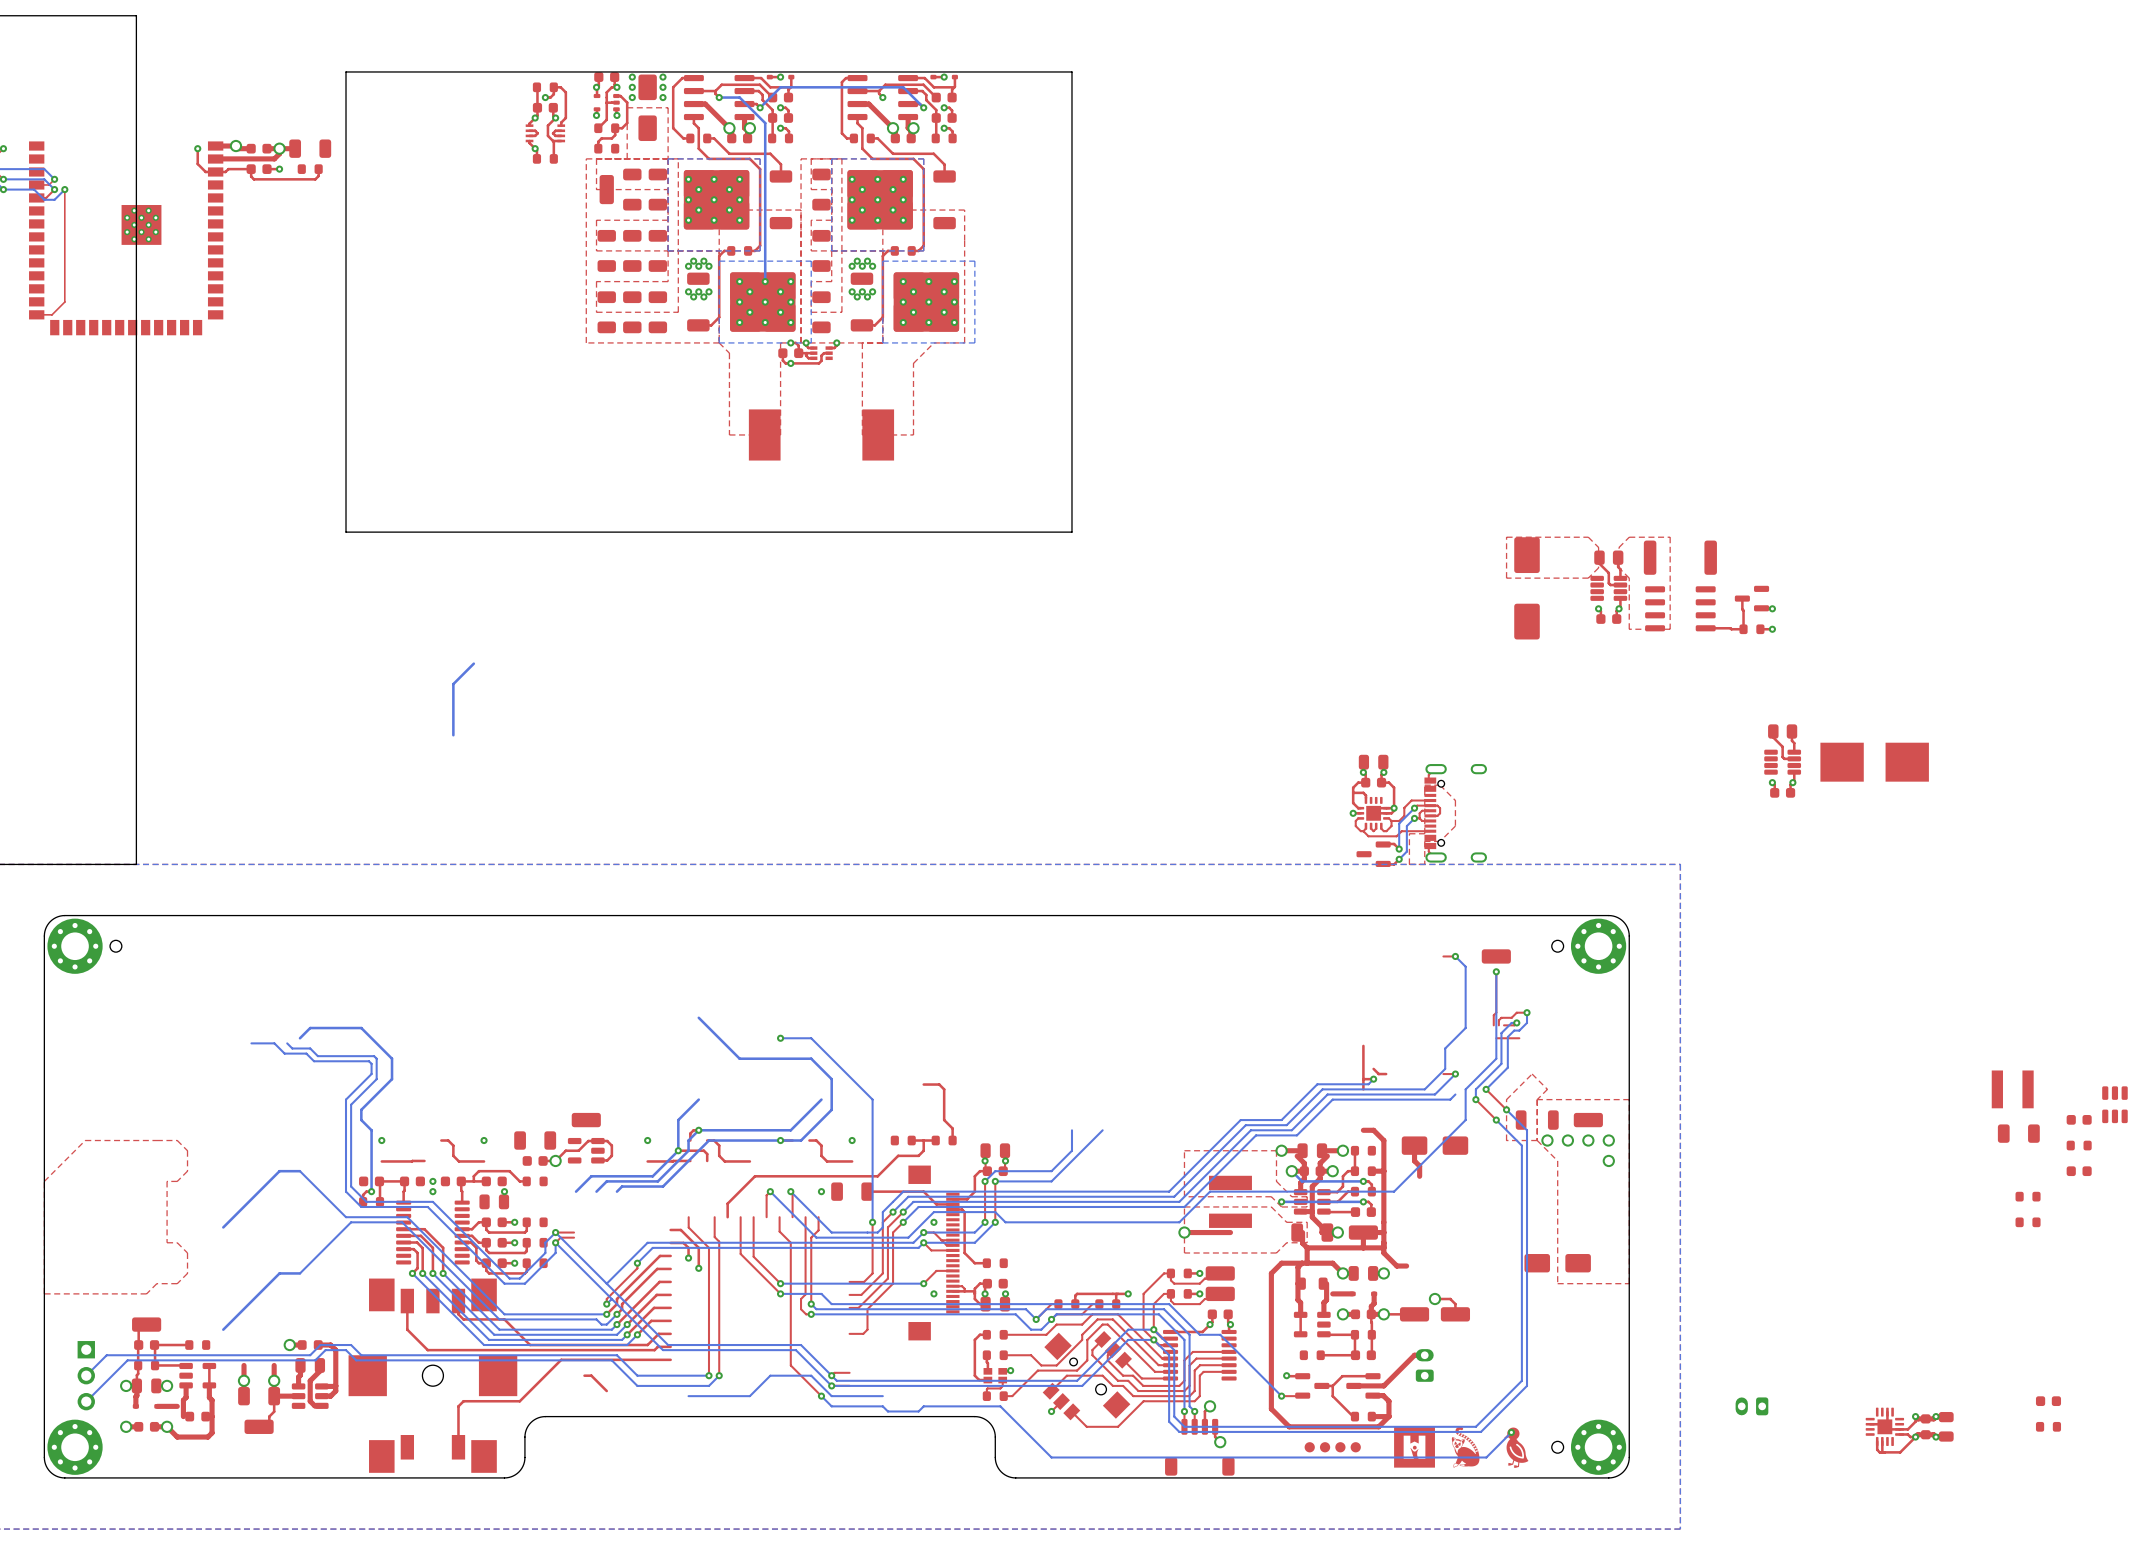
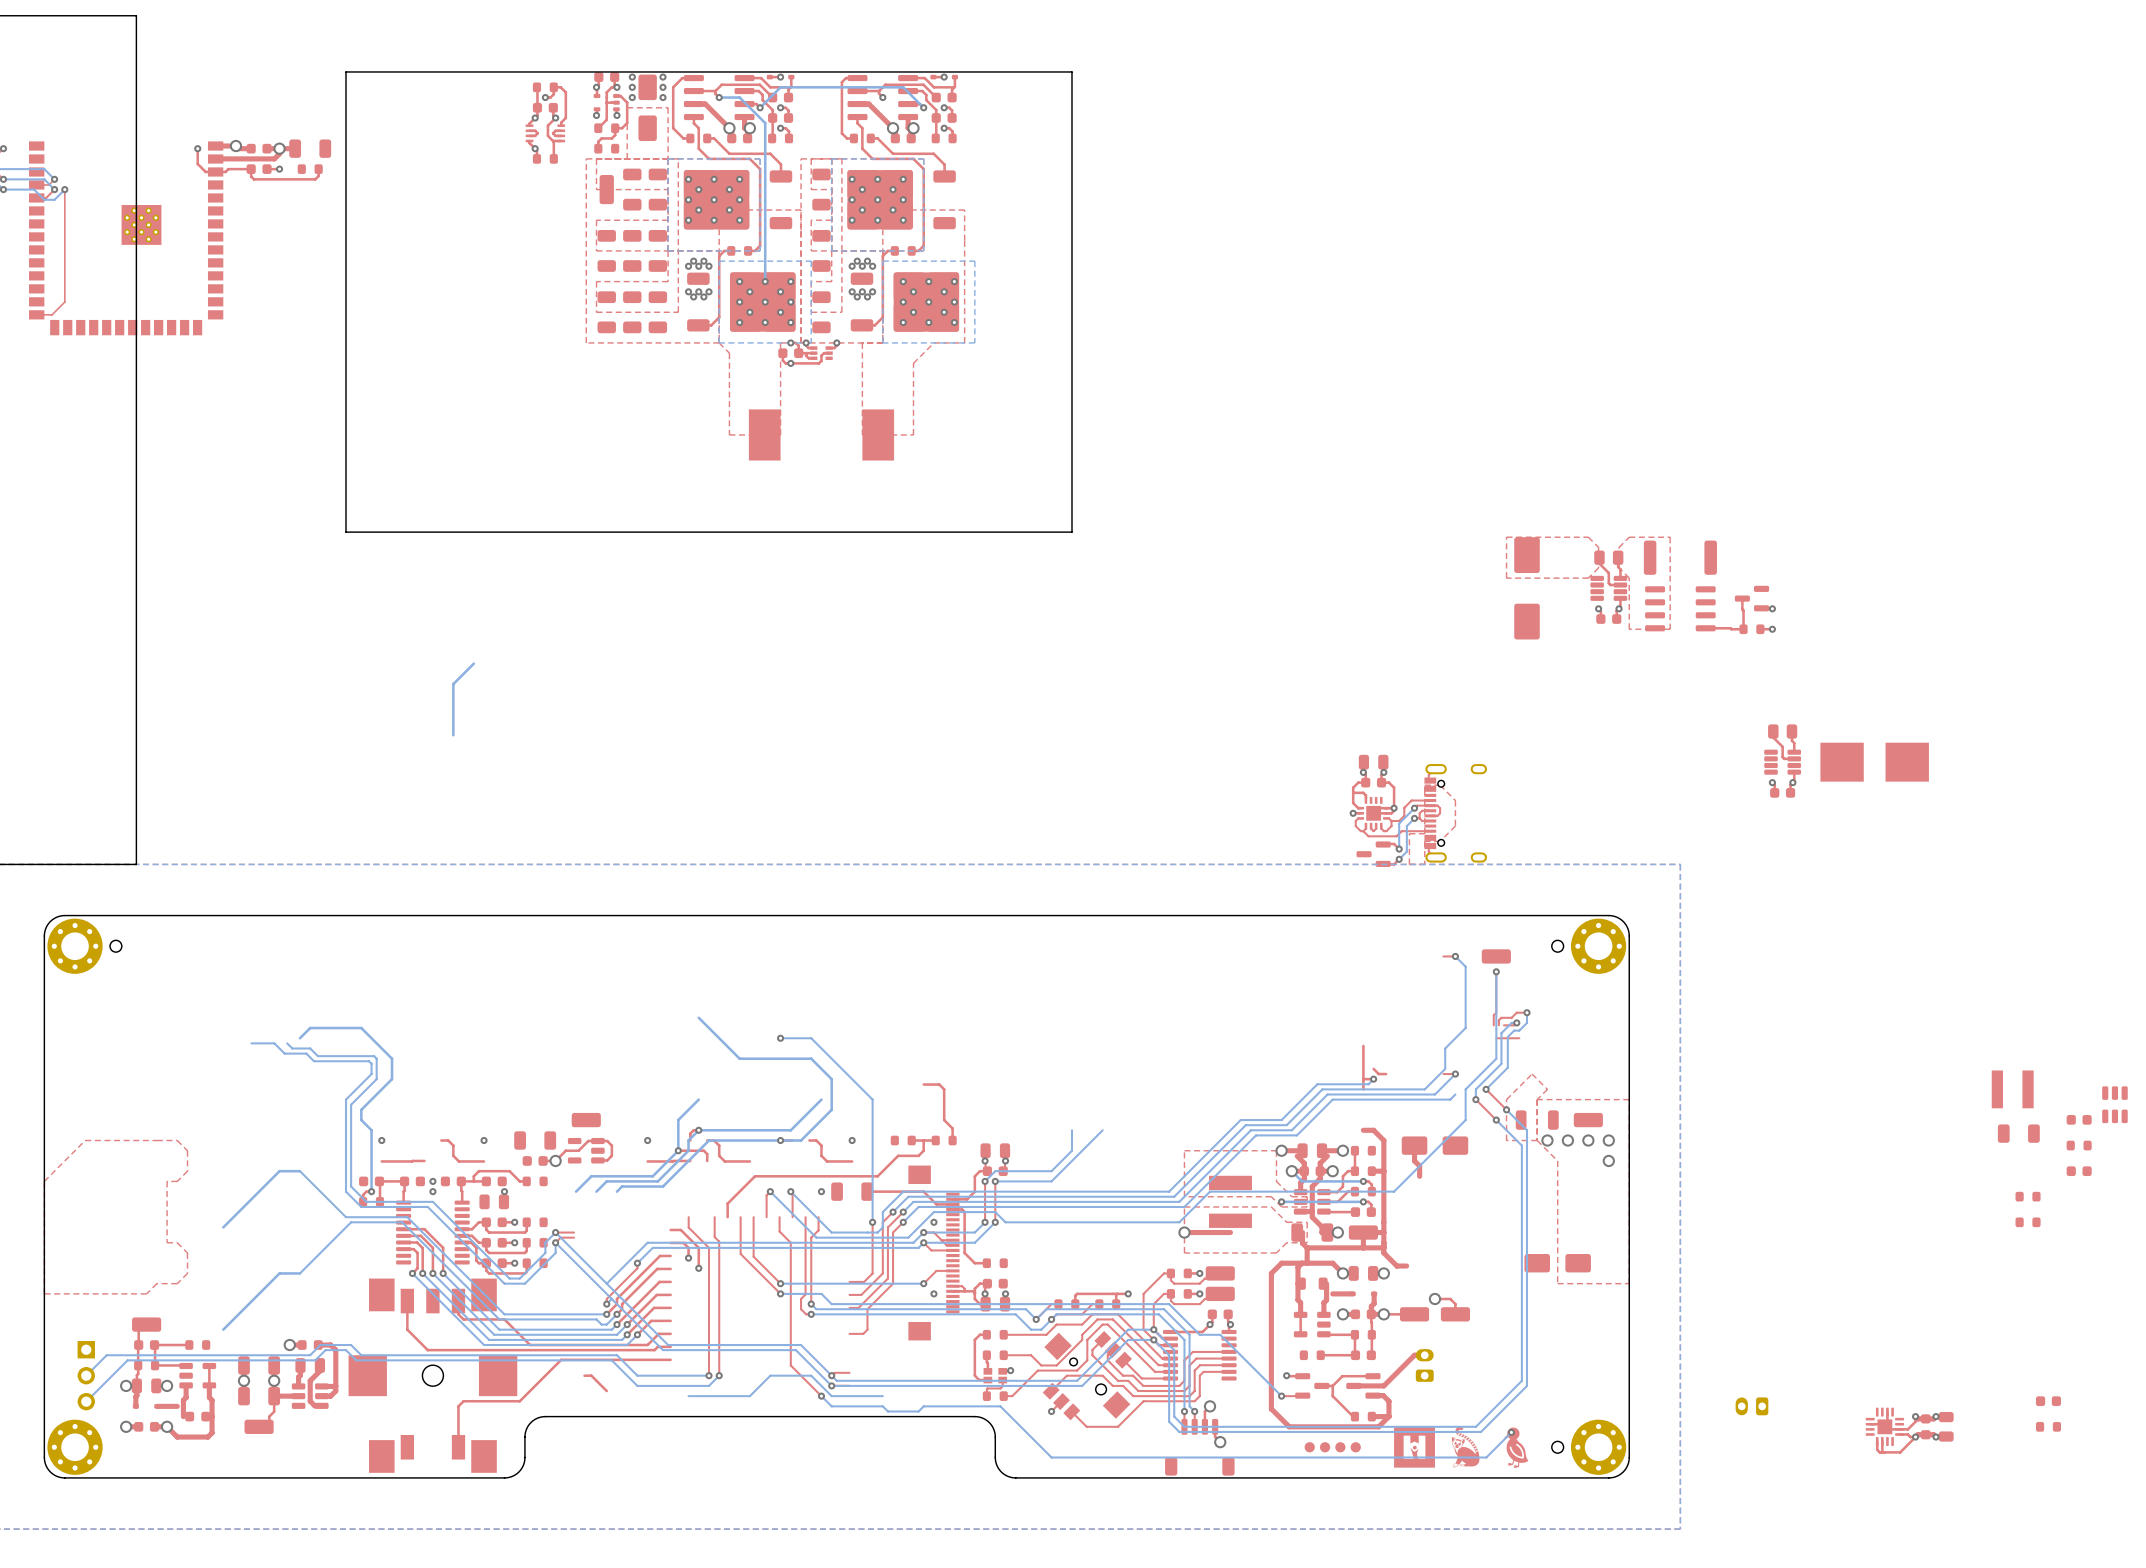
part: none -> (259, 1365)

